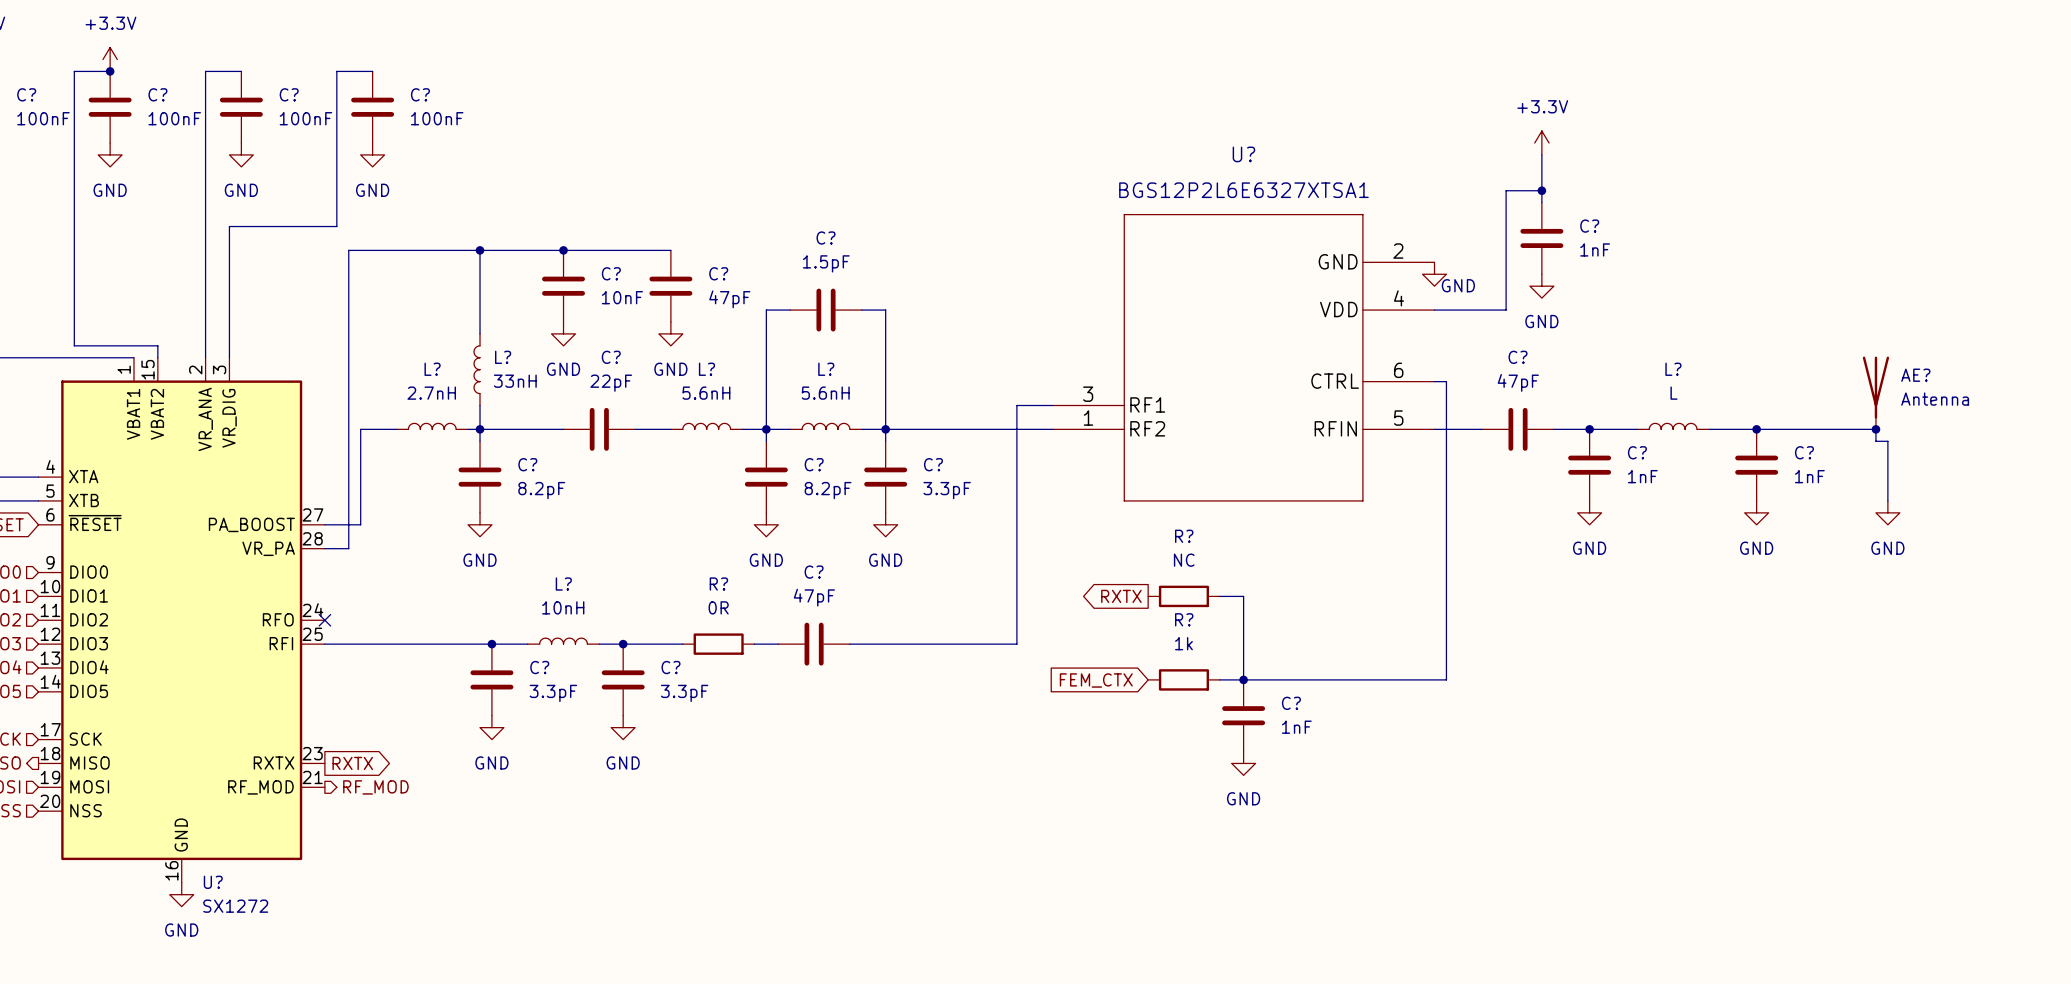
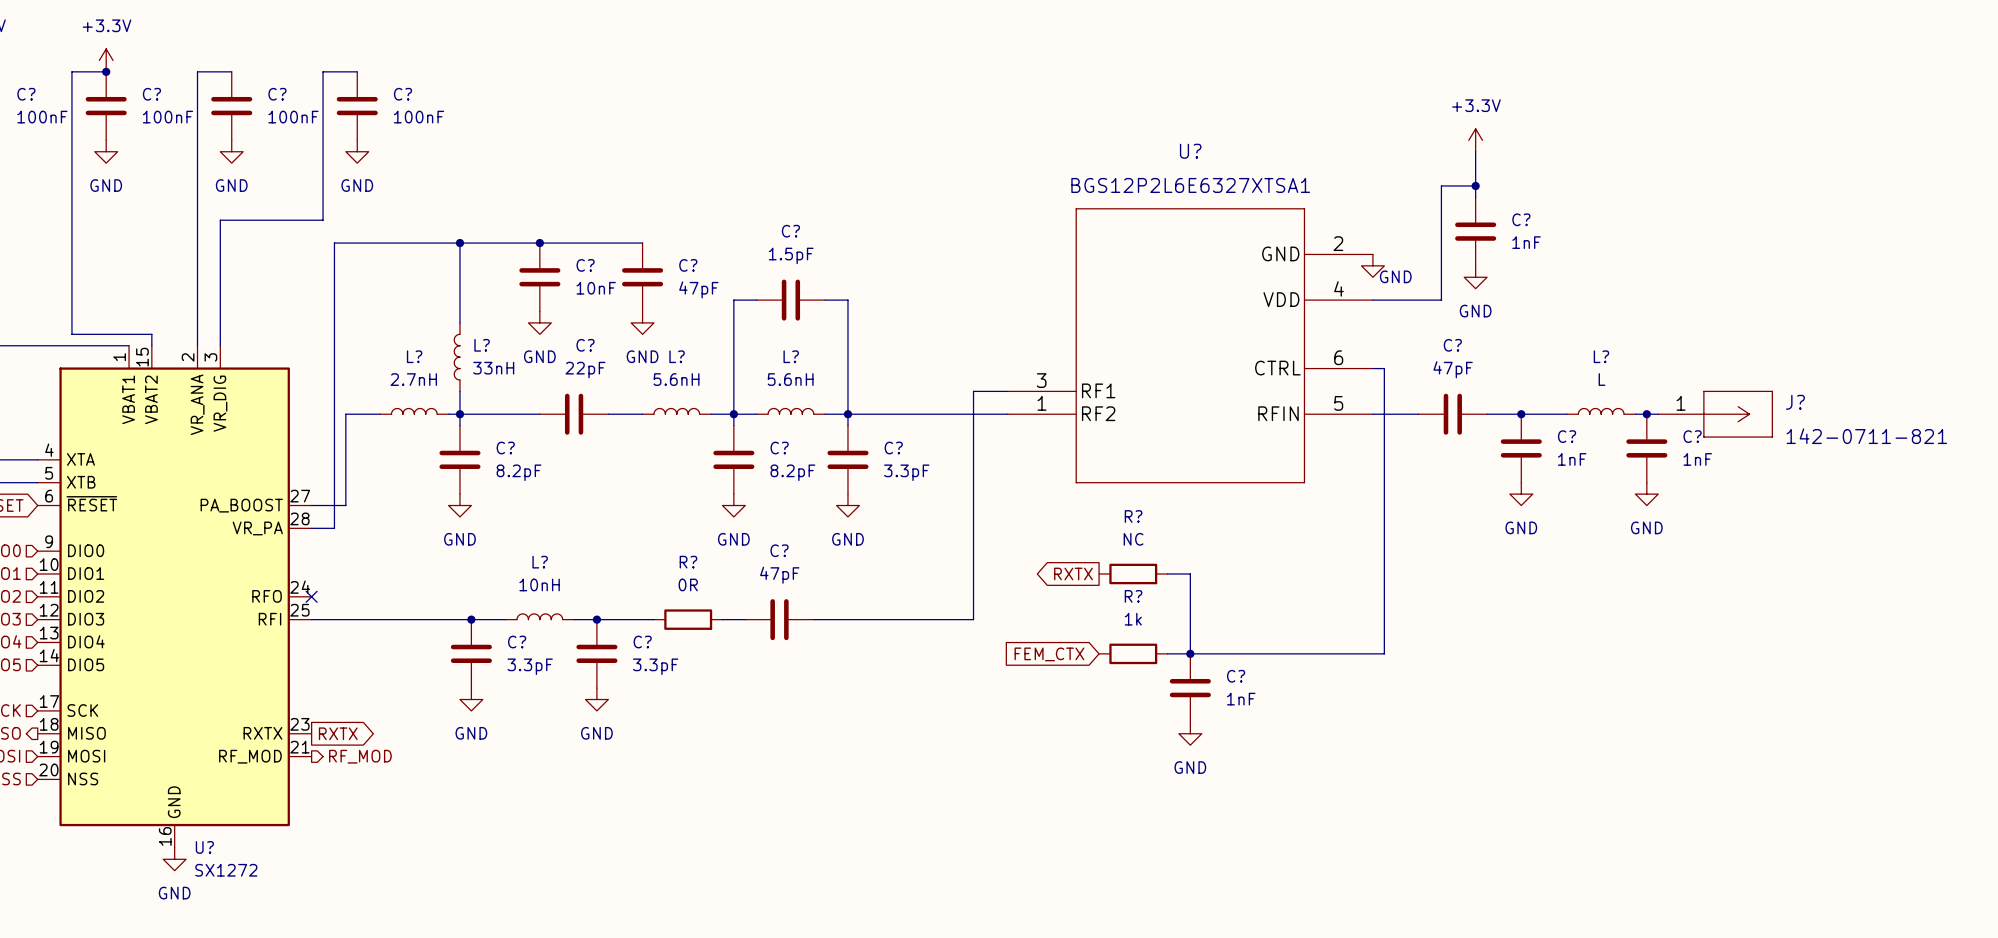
AE?: Antenna (1875, 392) -> none
wire: (1732, 429) (1875, 429) (1875, 441) (1887, 441) (1887, 500) -> none
junction position: (1756, 429) -> (1646, 414)
J?: none -> 142-0711-821 (1715, 414)
junction: (1875, 429) -> none
C? position: (1756, 465) -> (1646, 448)
power symbol position: GND (1756, 512) -> GND (1646, 494)
power symbol: GND (1887, 512) -> none

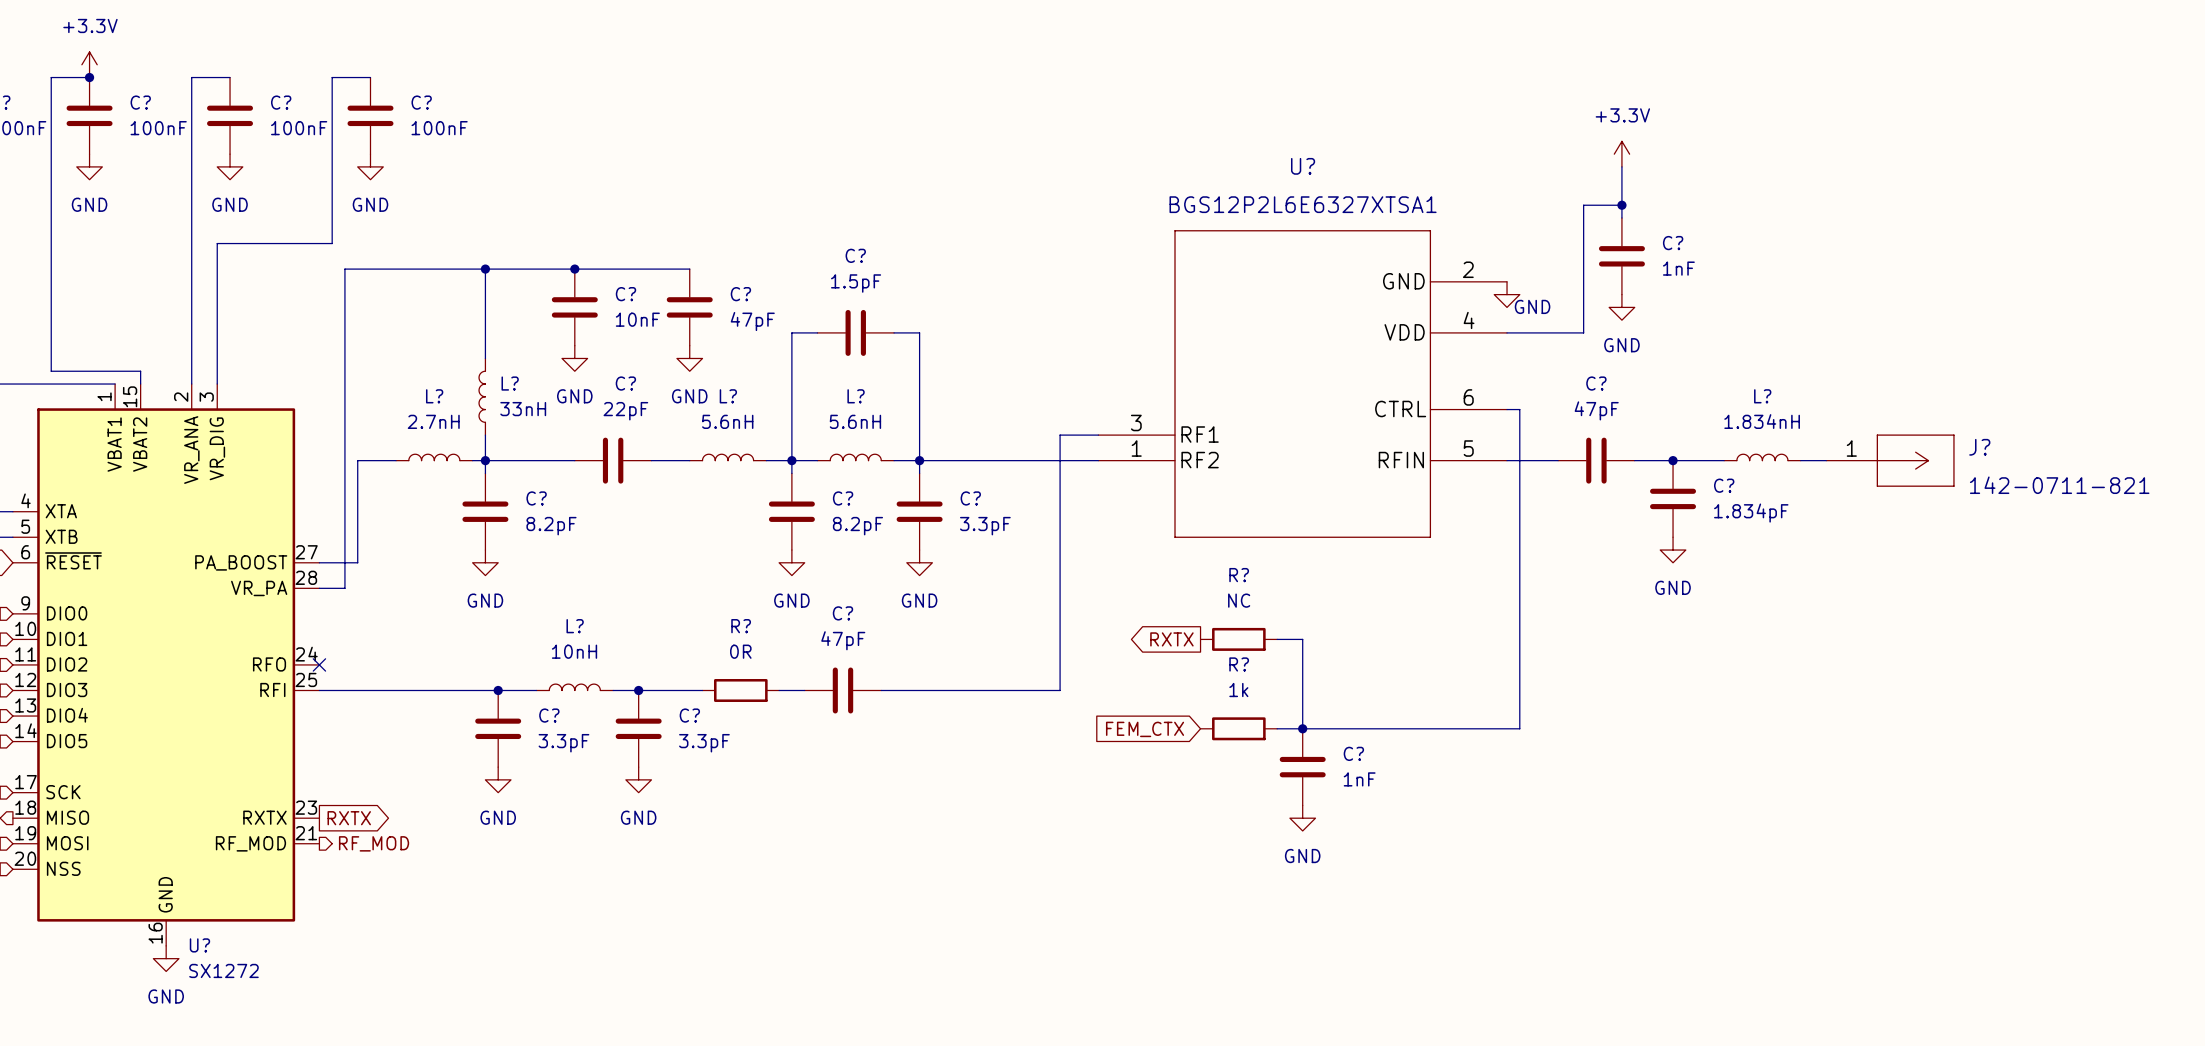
L? value: L (1602, 379) -> 1.834nH (1762, 421)
junction: (1646, 414) -> none
C?: 1nF (1646, 448) -> none
C? value: 1nF (1572, 459) -> 1.834pF (1751, 513)
power symbol: GND (1646, 494) -> none

